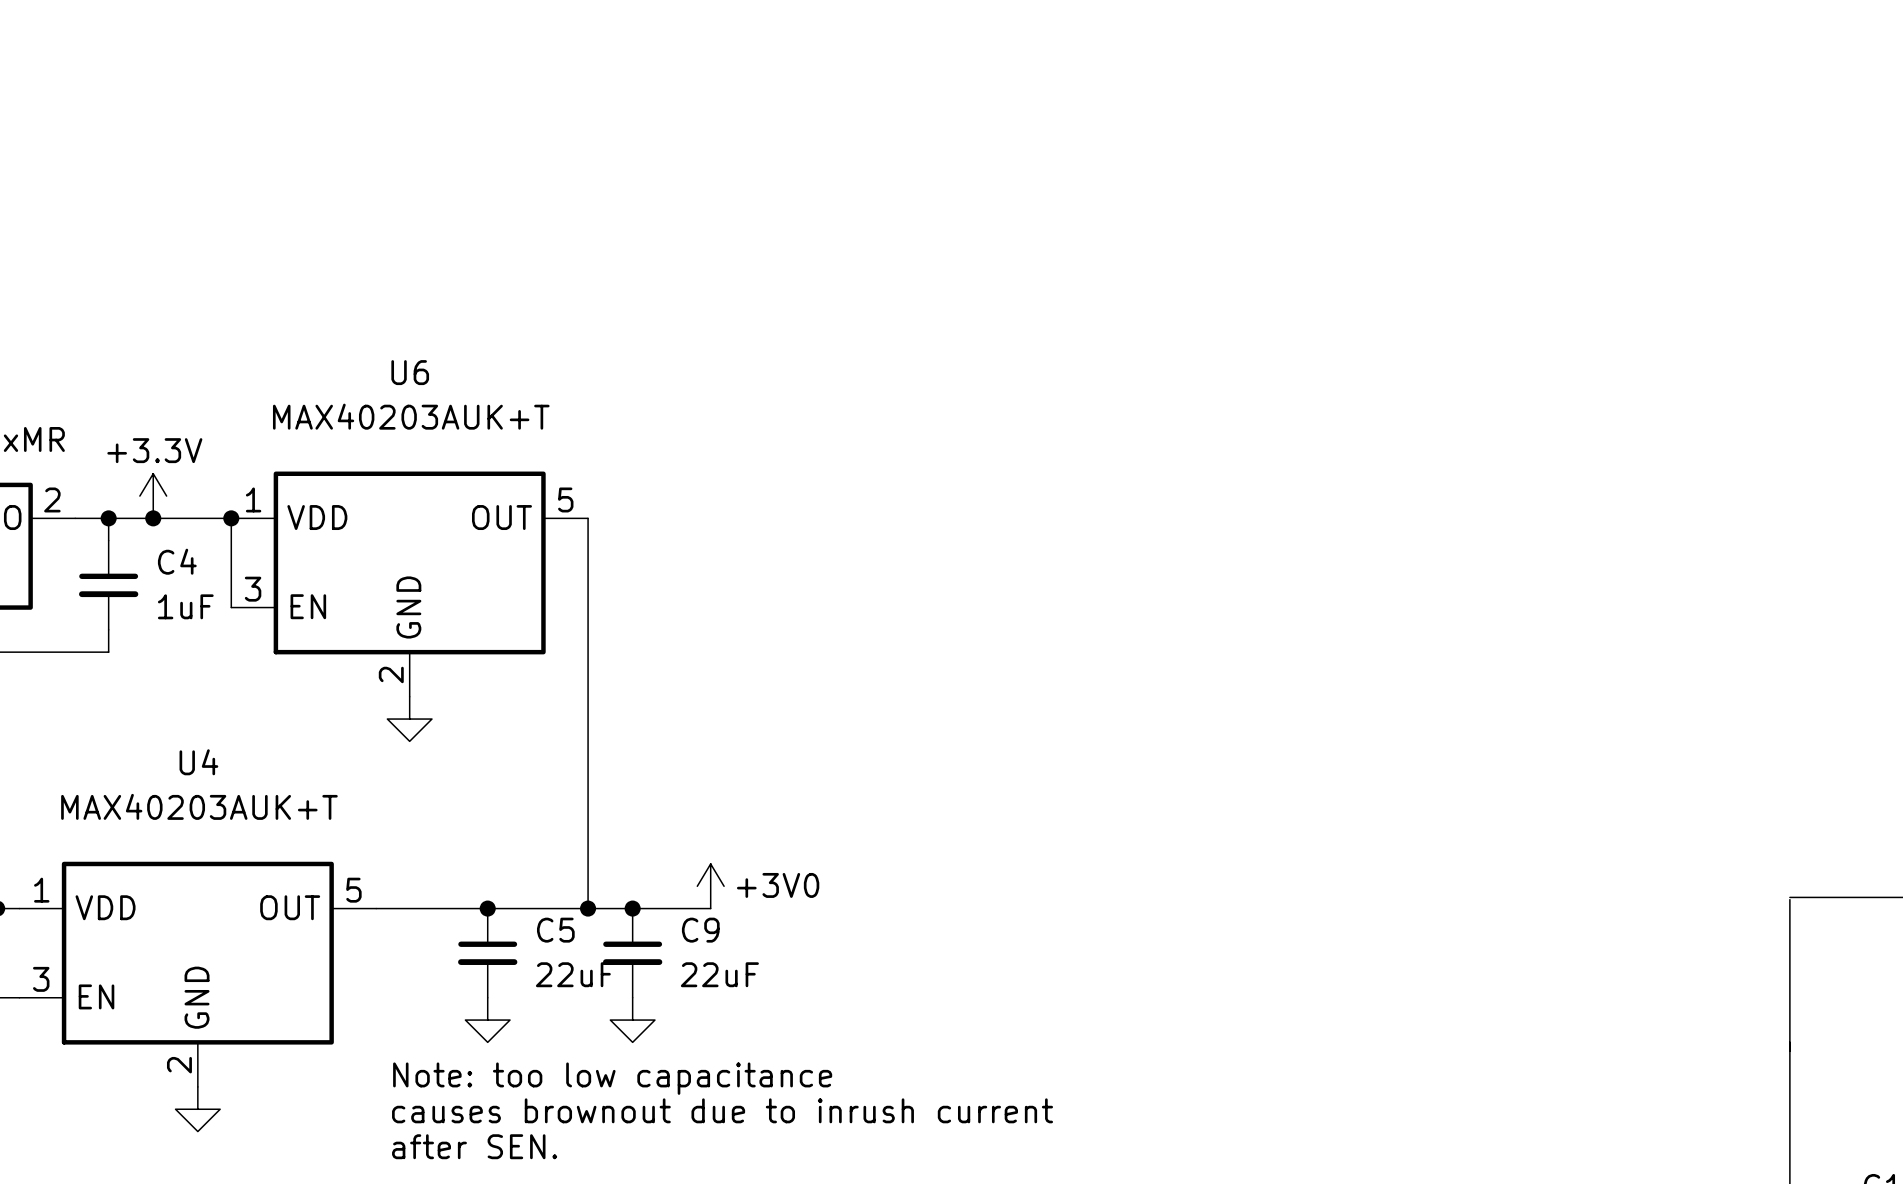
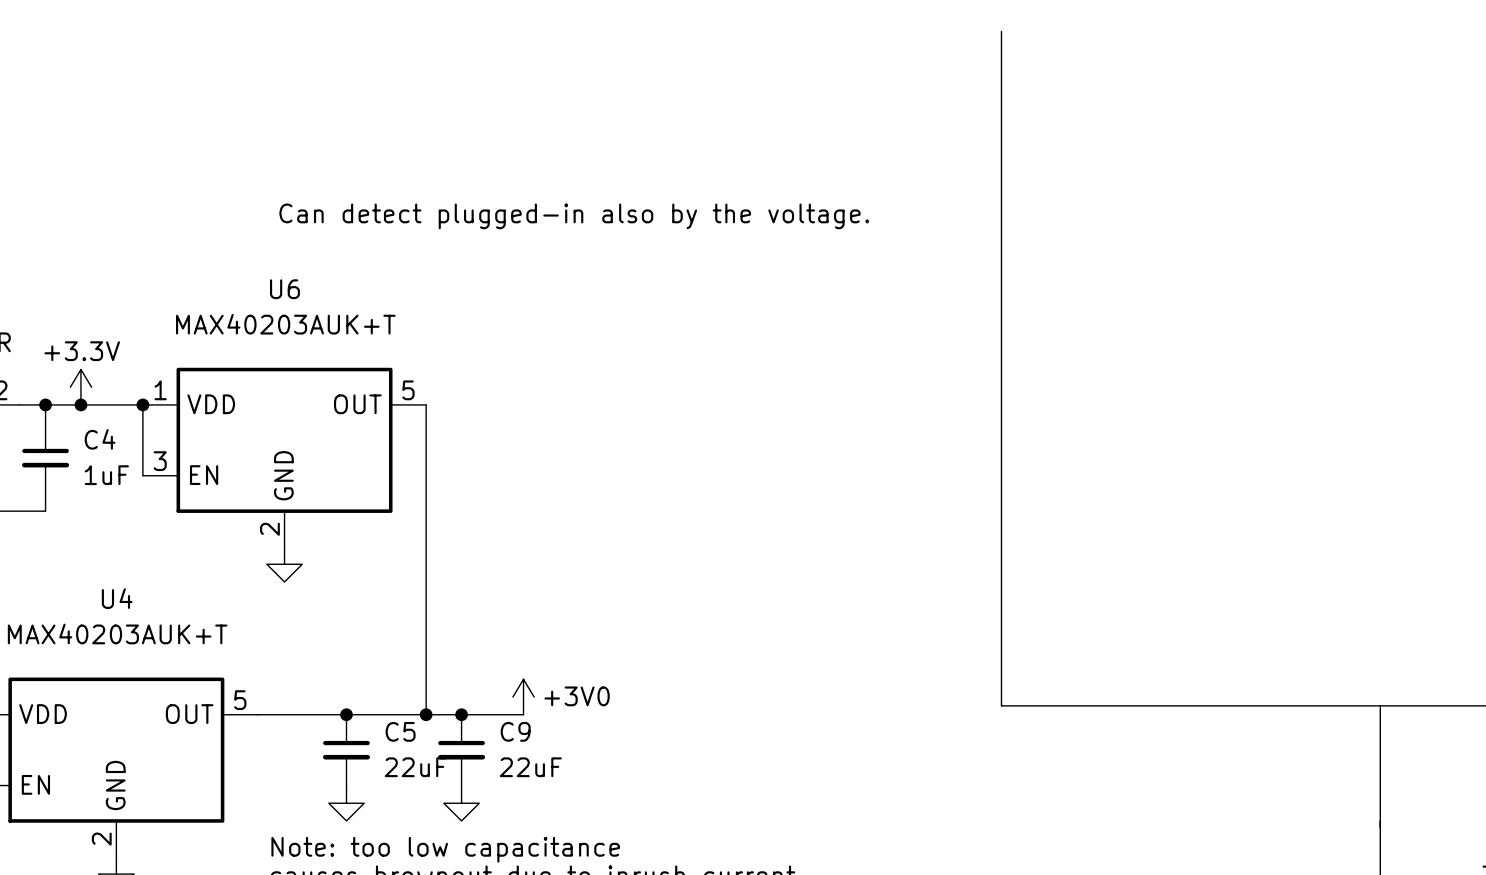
line: none -> (1001, 31) (1001, 705) (1380, 705)
text: none -> Can detect plugged-in also by the voltage. (574, 216)

